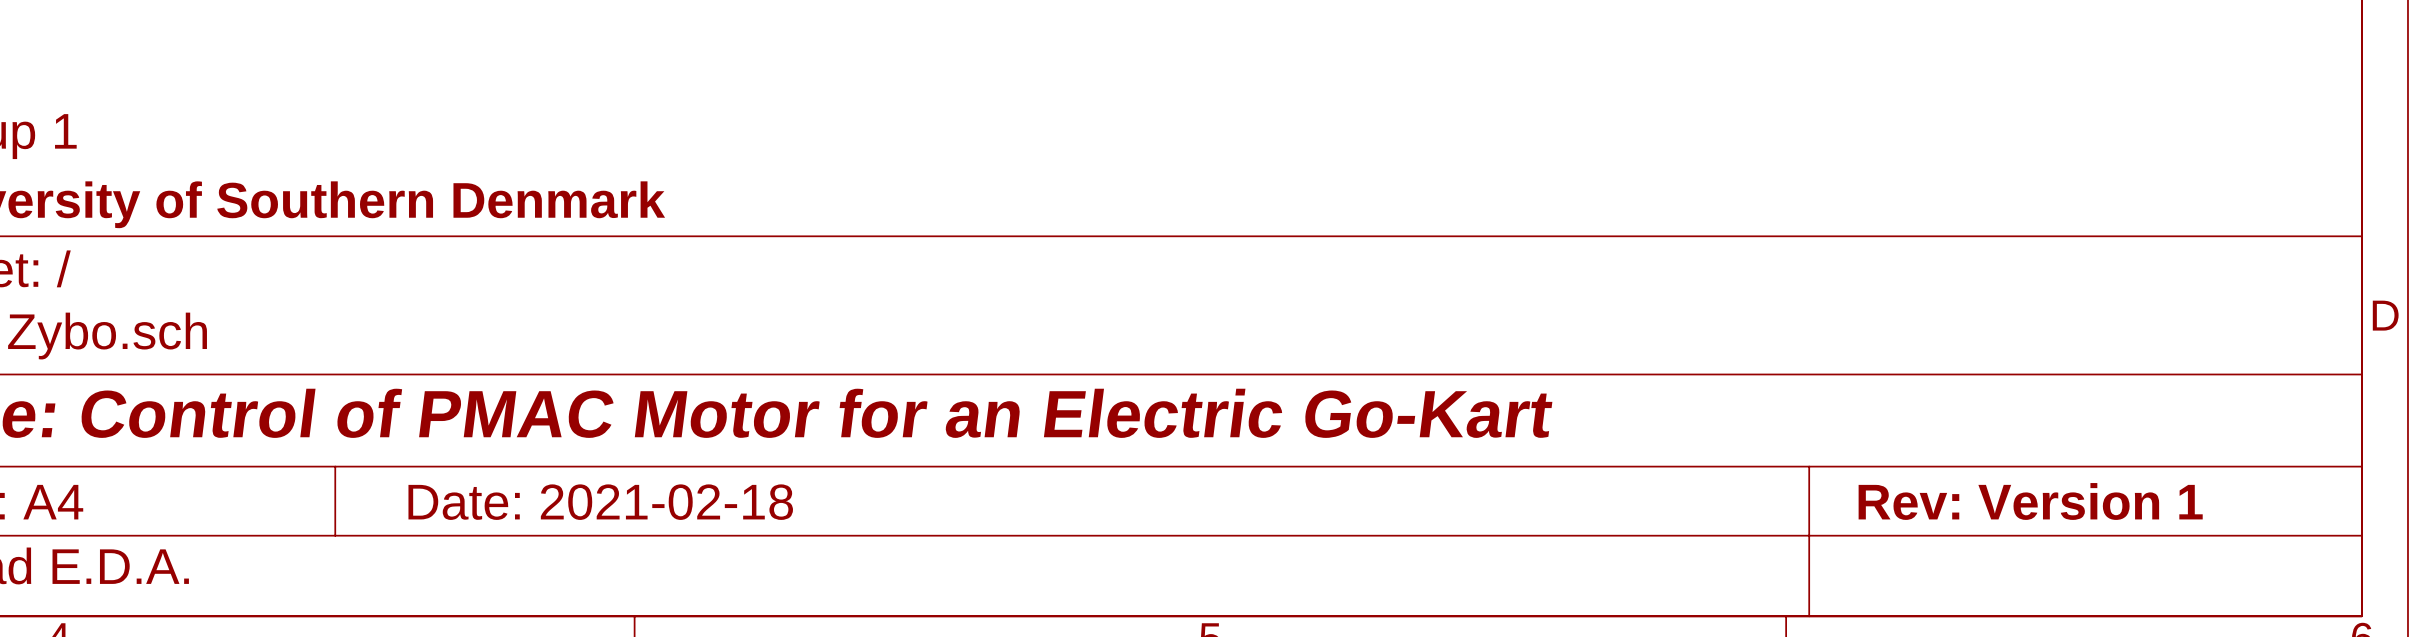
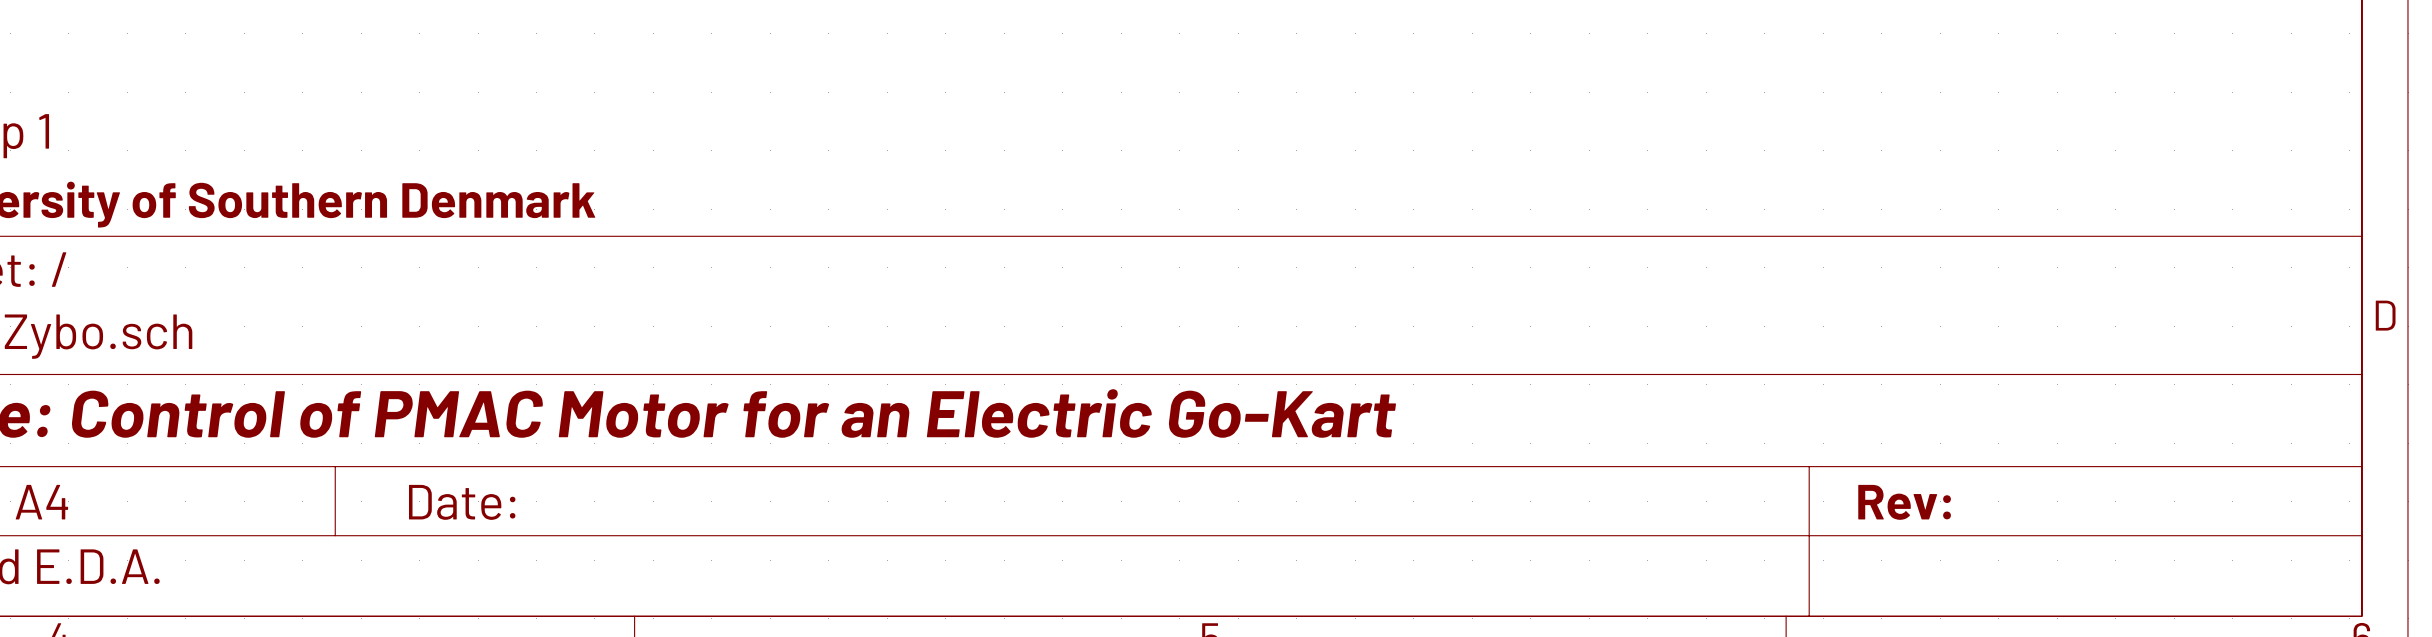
title block: Rev: Version 1 (2030, 501) -> Rev: (1904, 502)
title block: Date: 2021-02-18 (600, 502) -> Date: (462, 502)

